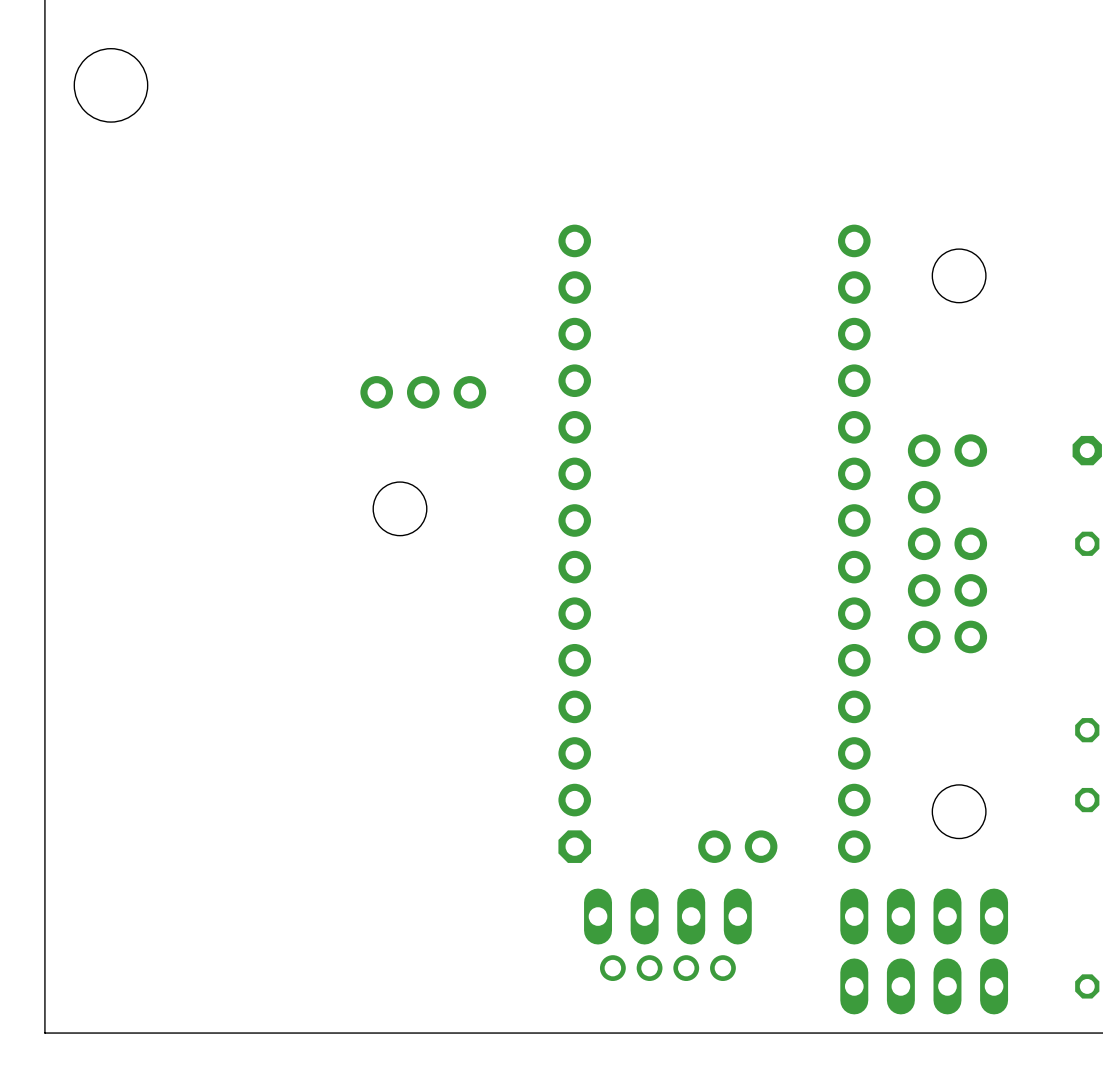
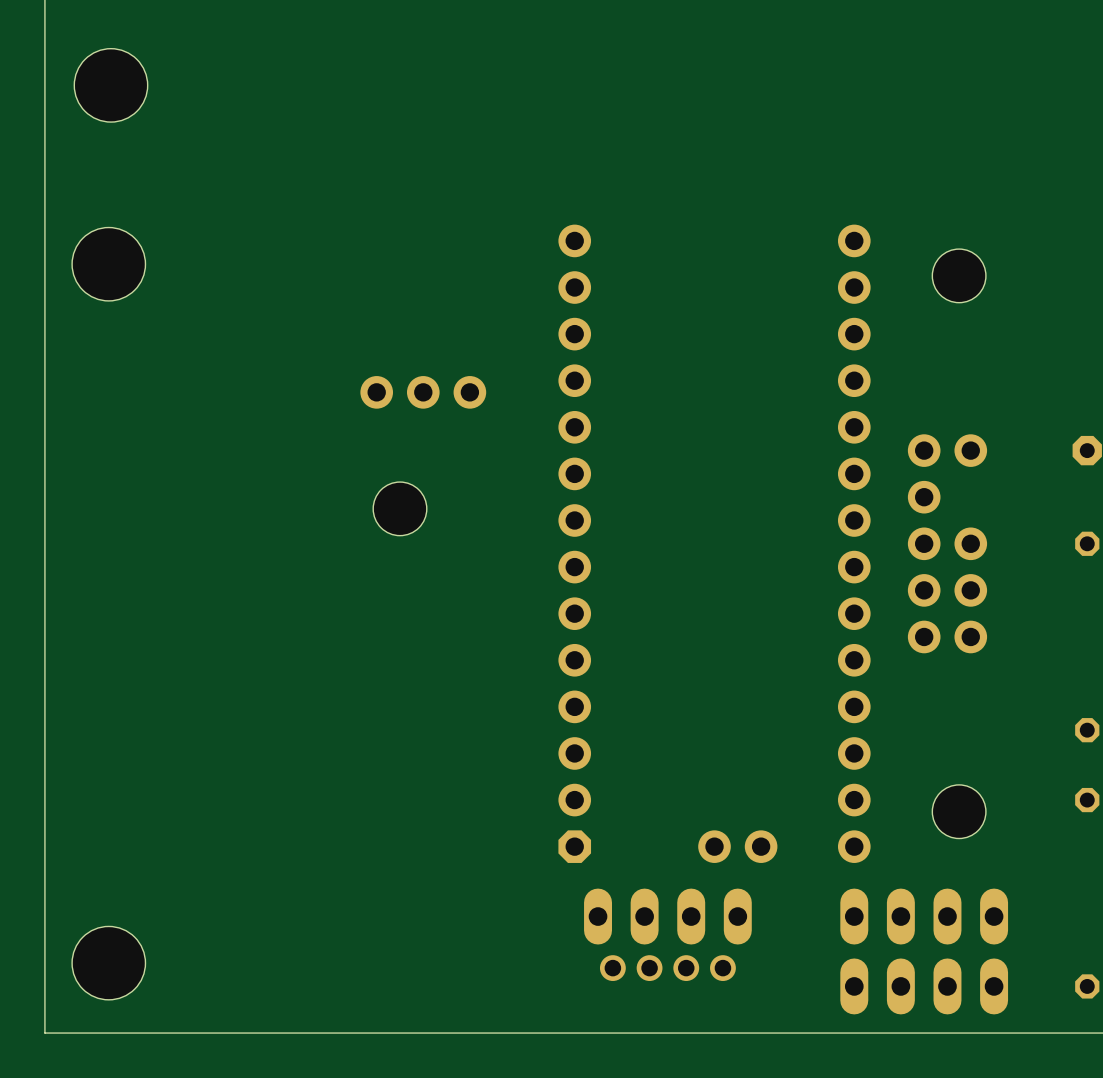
hole: none -> (108, 264)
hole: none -> (108, 963)

